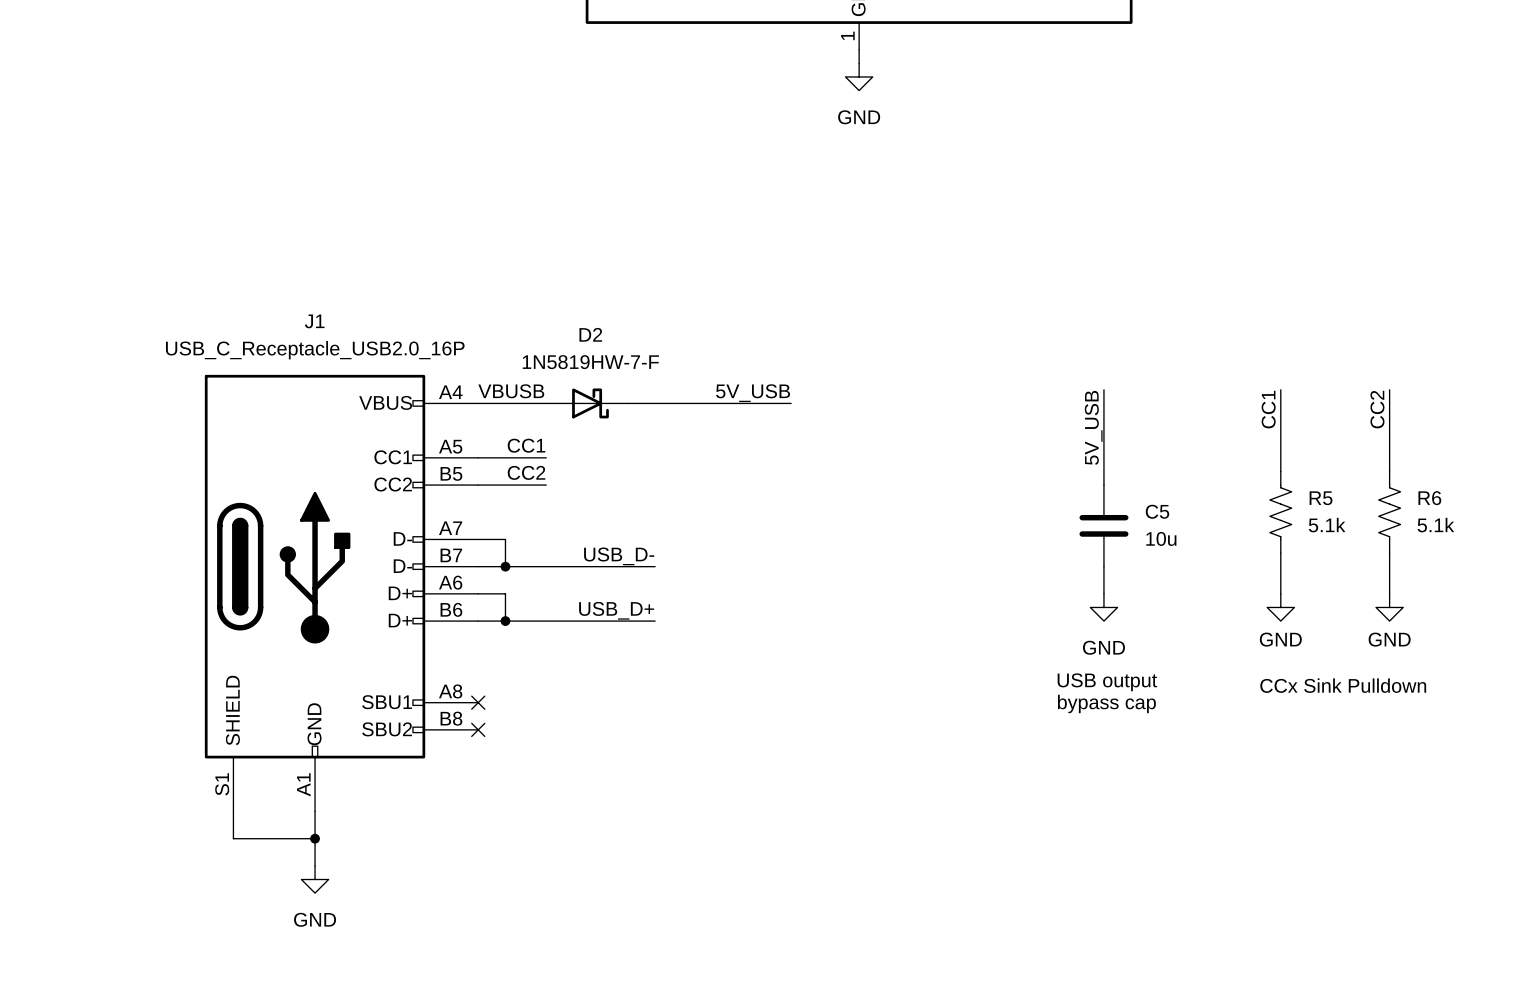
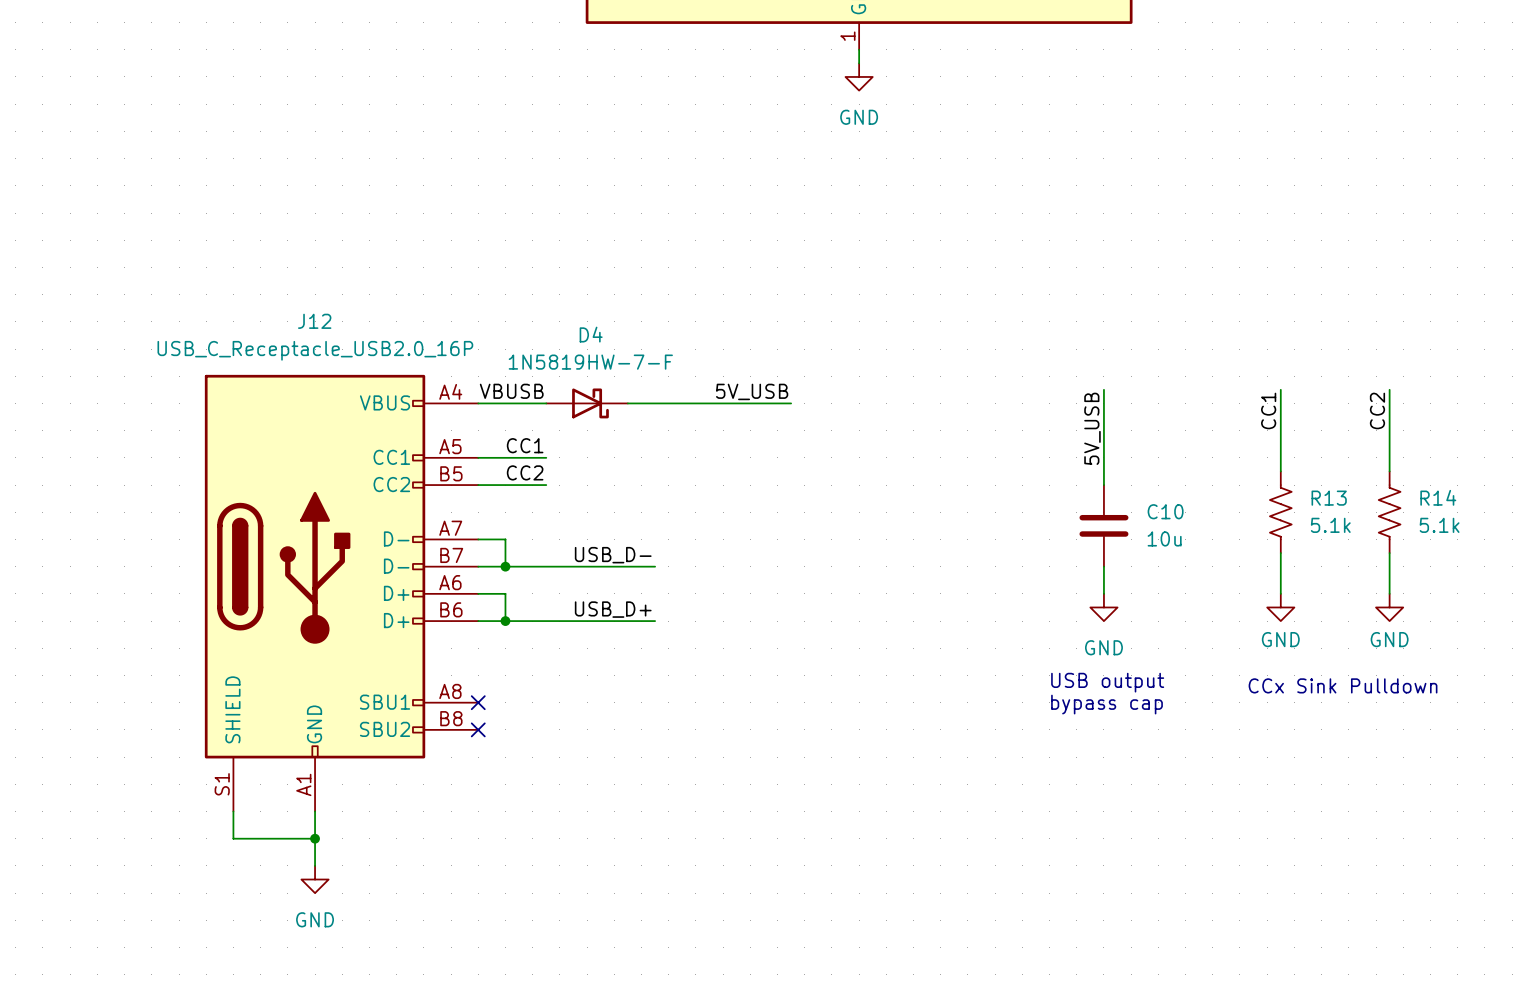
J1 name: J1 (314, 321) -> J12 (314, 321)
D2 name: D2 (590, 334) -> D4 (591, 334)
R5 name: R5 (1321, 498) -> R13 (1329, 498)
R6 name: R6 (1429, 498) -> R14 (1438, 497)
C5 name: C5 (1157, 511) -> C10 (1165, 511)

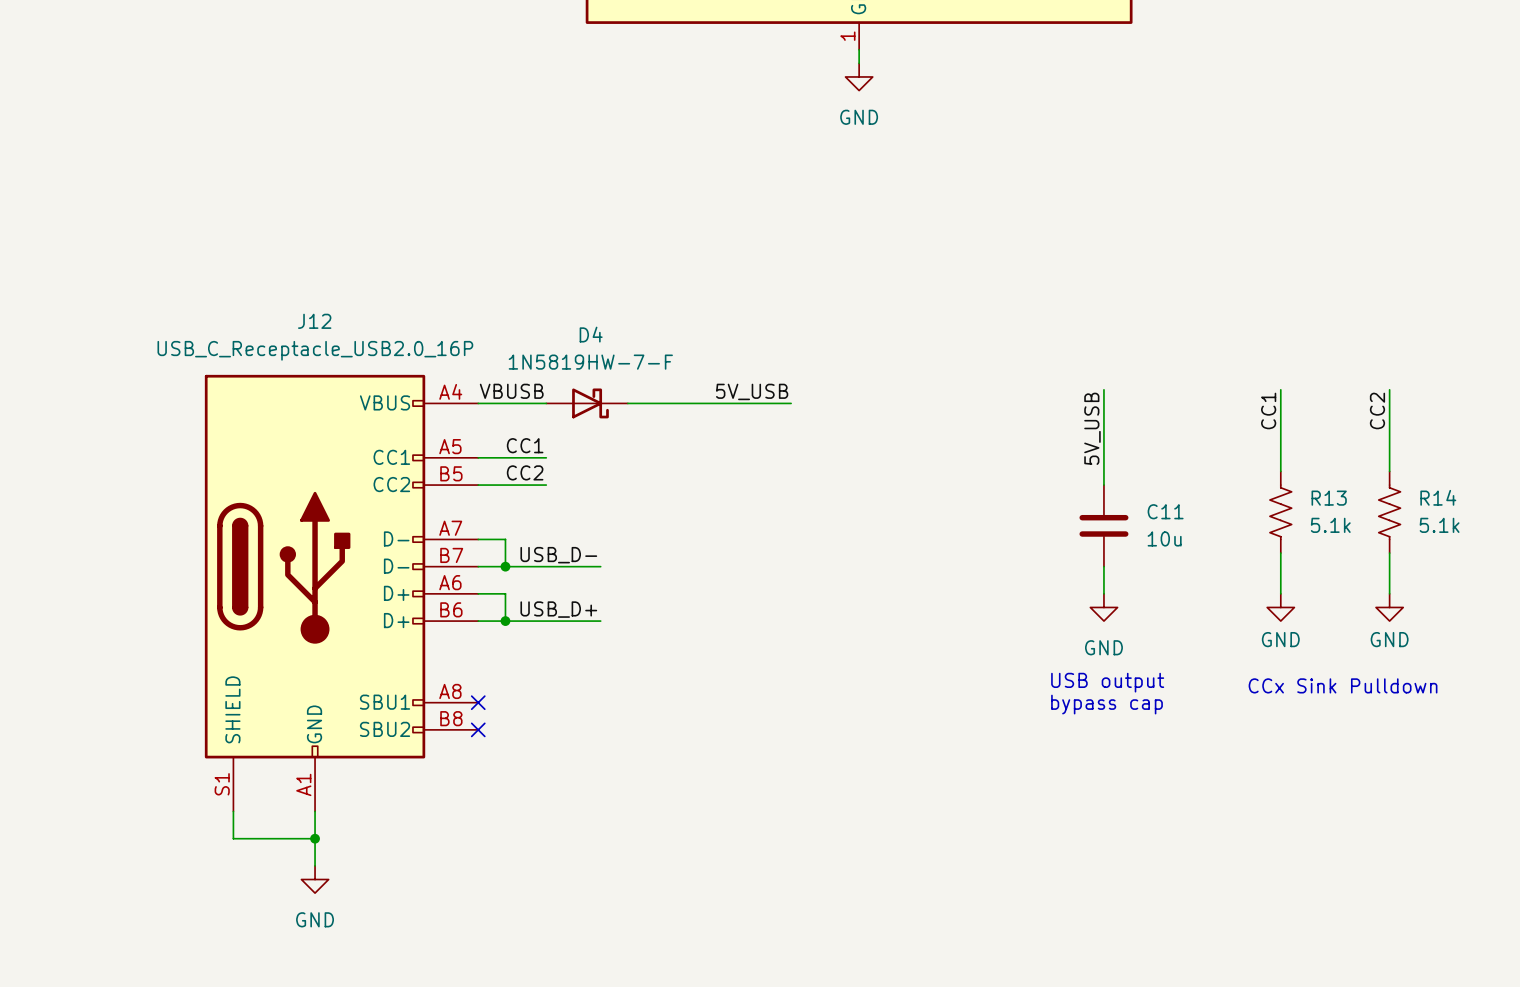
C10 name: C10 (1165, 511) -> C11 (1165, 511)
label position: USB_D- (613, 555) -> USB_D- (558, 555)
wire: (600, 566) (655, 566) -> none
label position: USB_D+ (613, 609) -> USB_D+ (558, 609)
wire: (600, 621) (655, 621) -> none

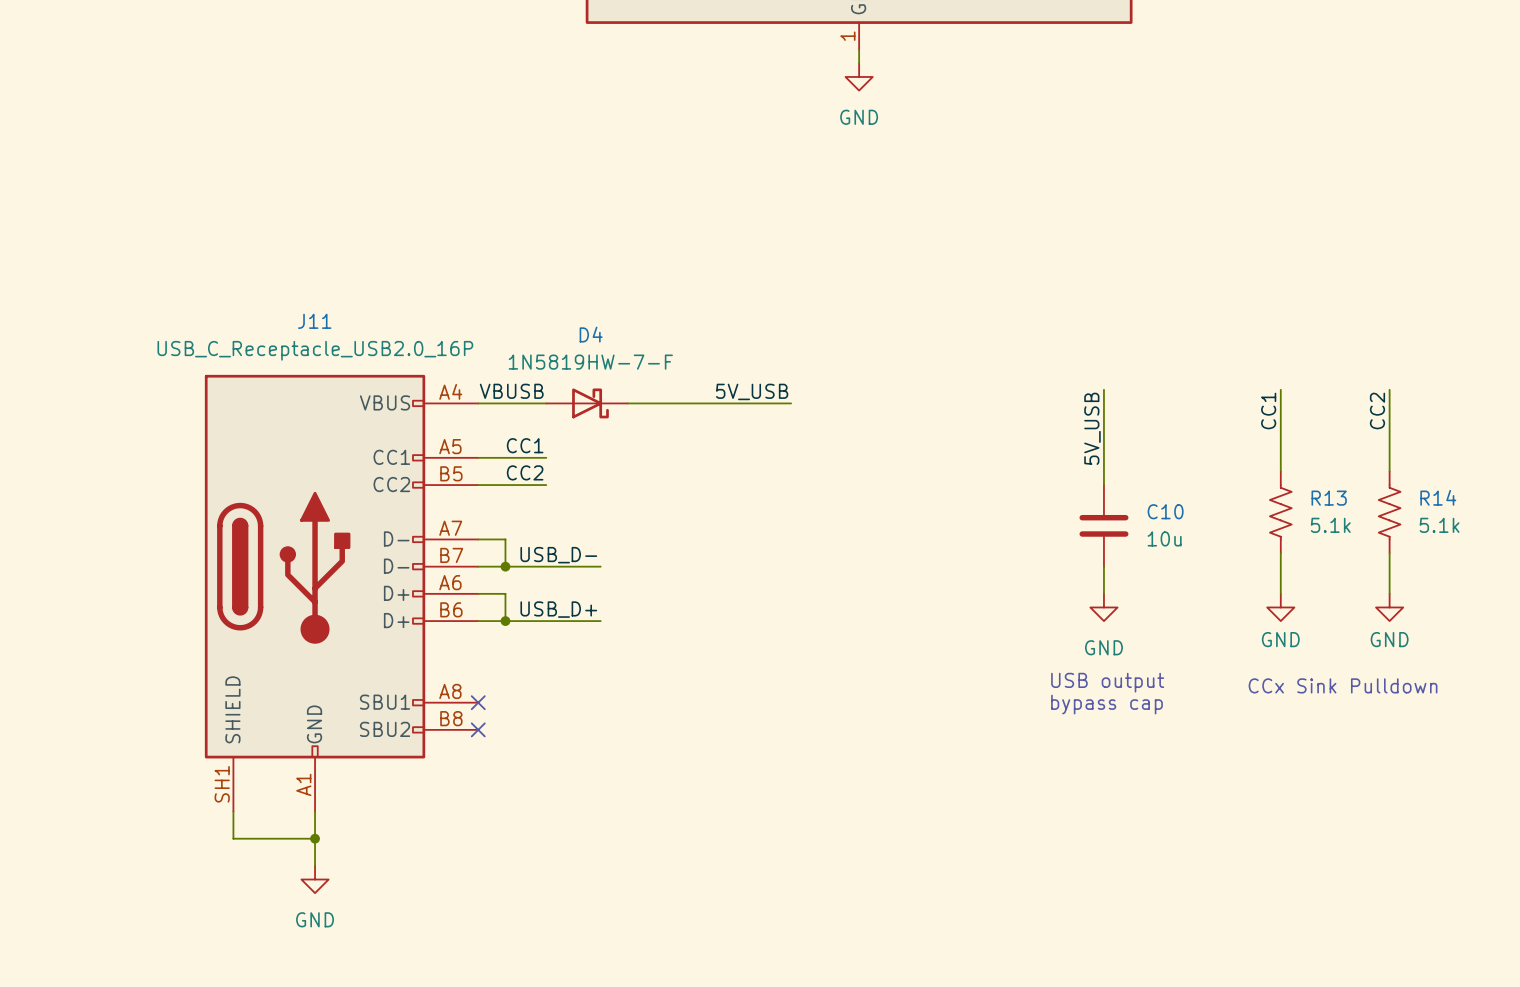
J12 name: J12 (314, 321) -> J11 (314, 321)
C11 name: C11 (1165, 511) -> C10 (1165, 511)
J12 pin number: S1 (222, 784) -> SH1 (222, 784)

